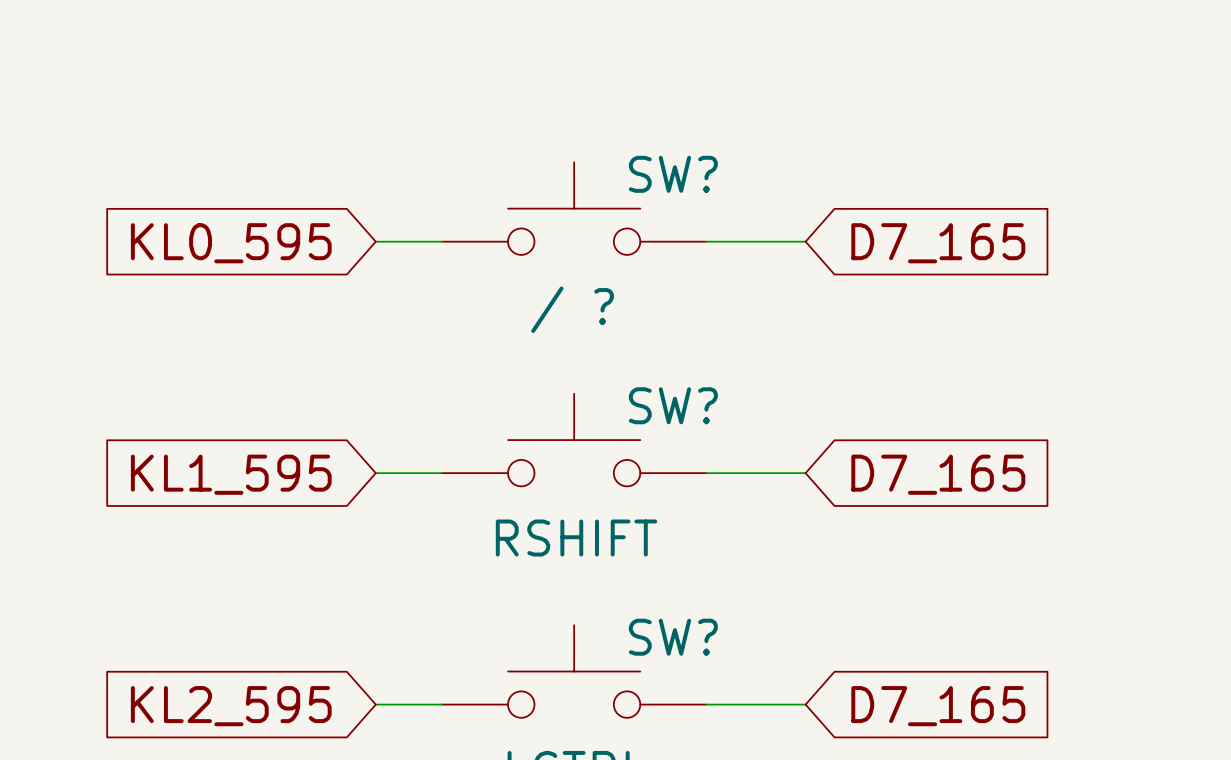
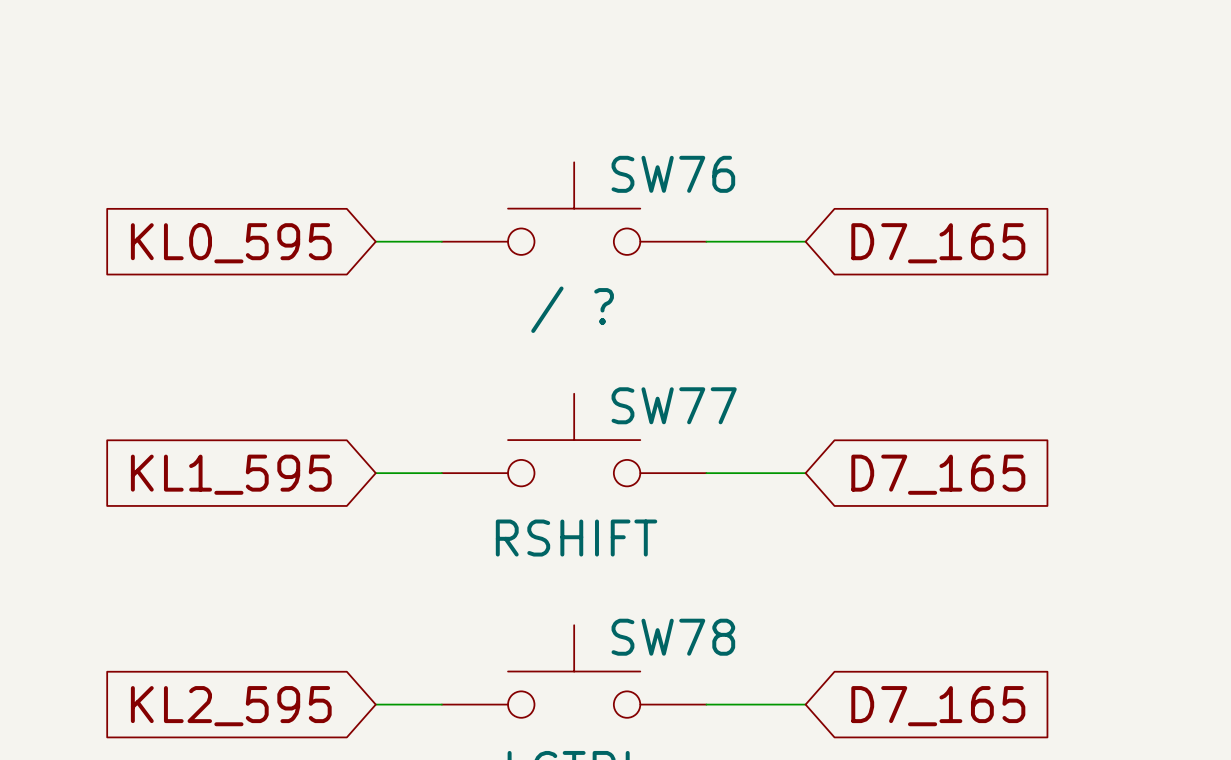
SW? name: SW? (673, 174) -> SW76 (673, 174)
SW? name: SW? (673, 405) -> SW77 (674, 405)
SW? name: SW? (673, 637) -> SW78 (673, 637)

